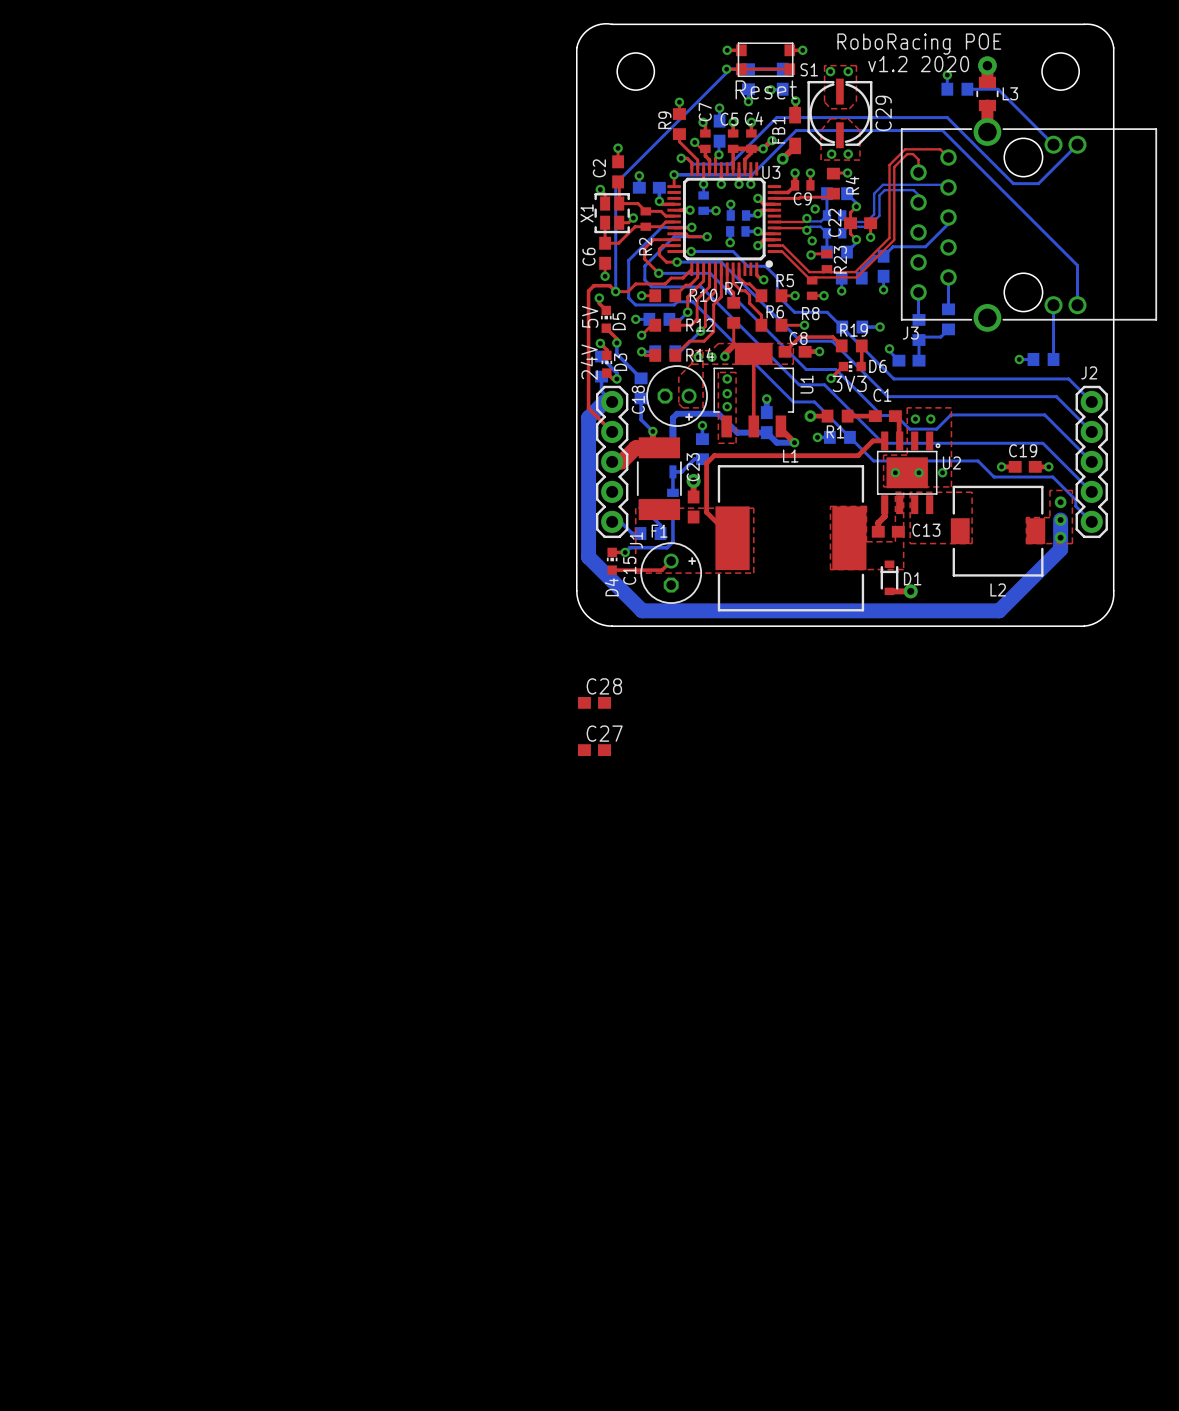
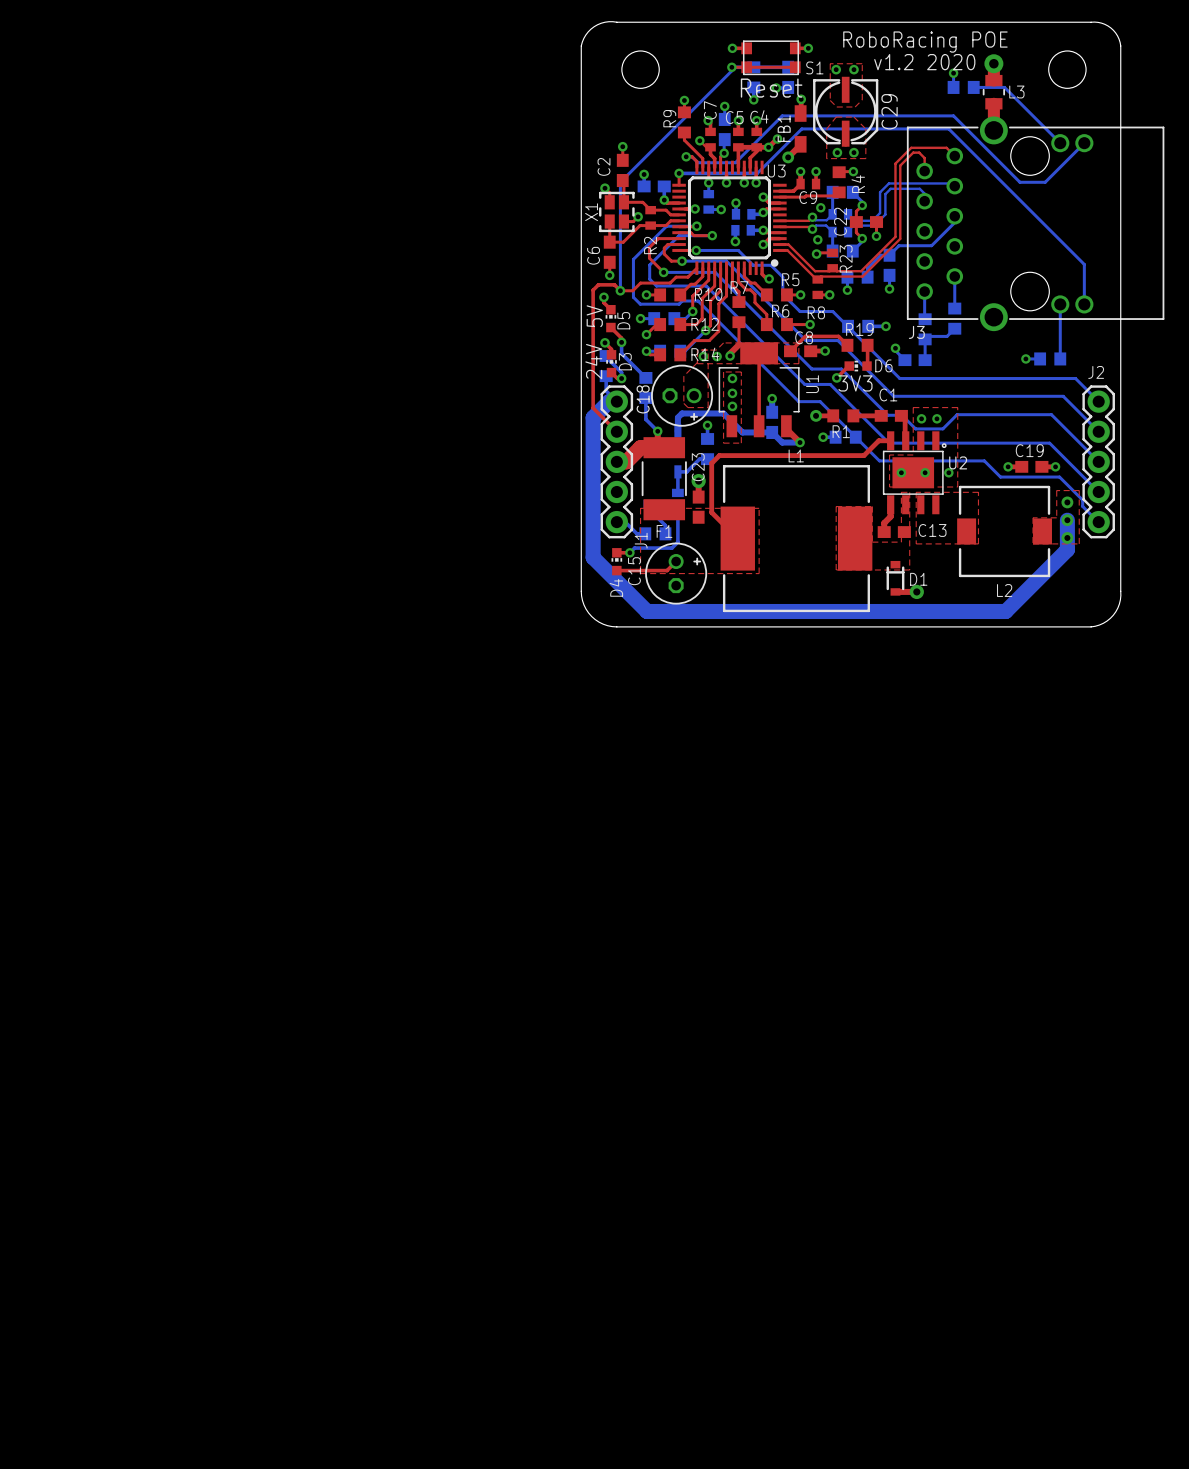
C28: (594, 702) -> none
C27: (594, 750) -> none

